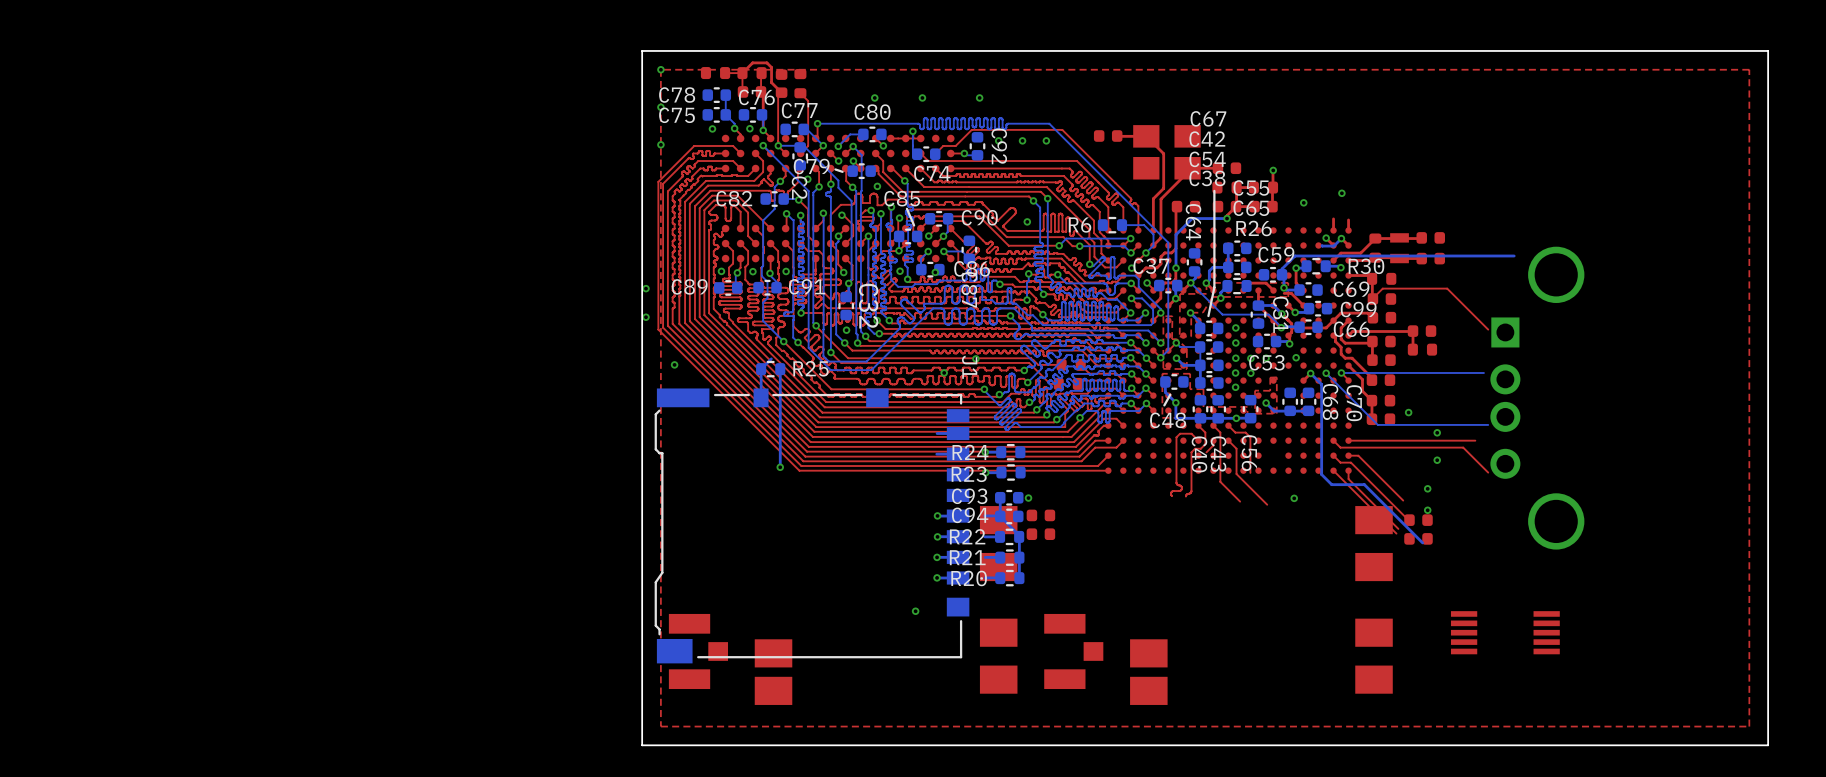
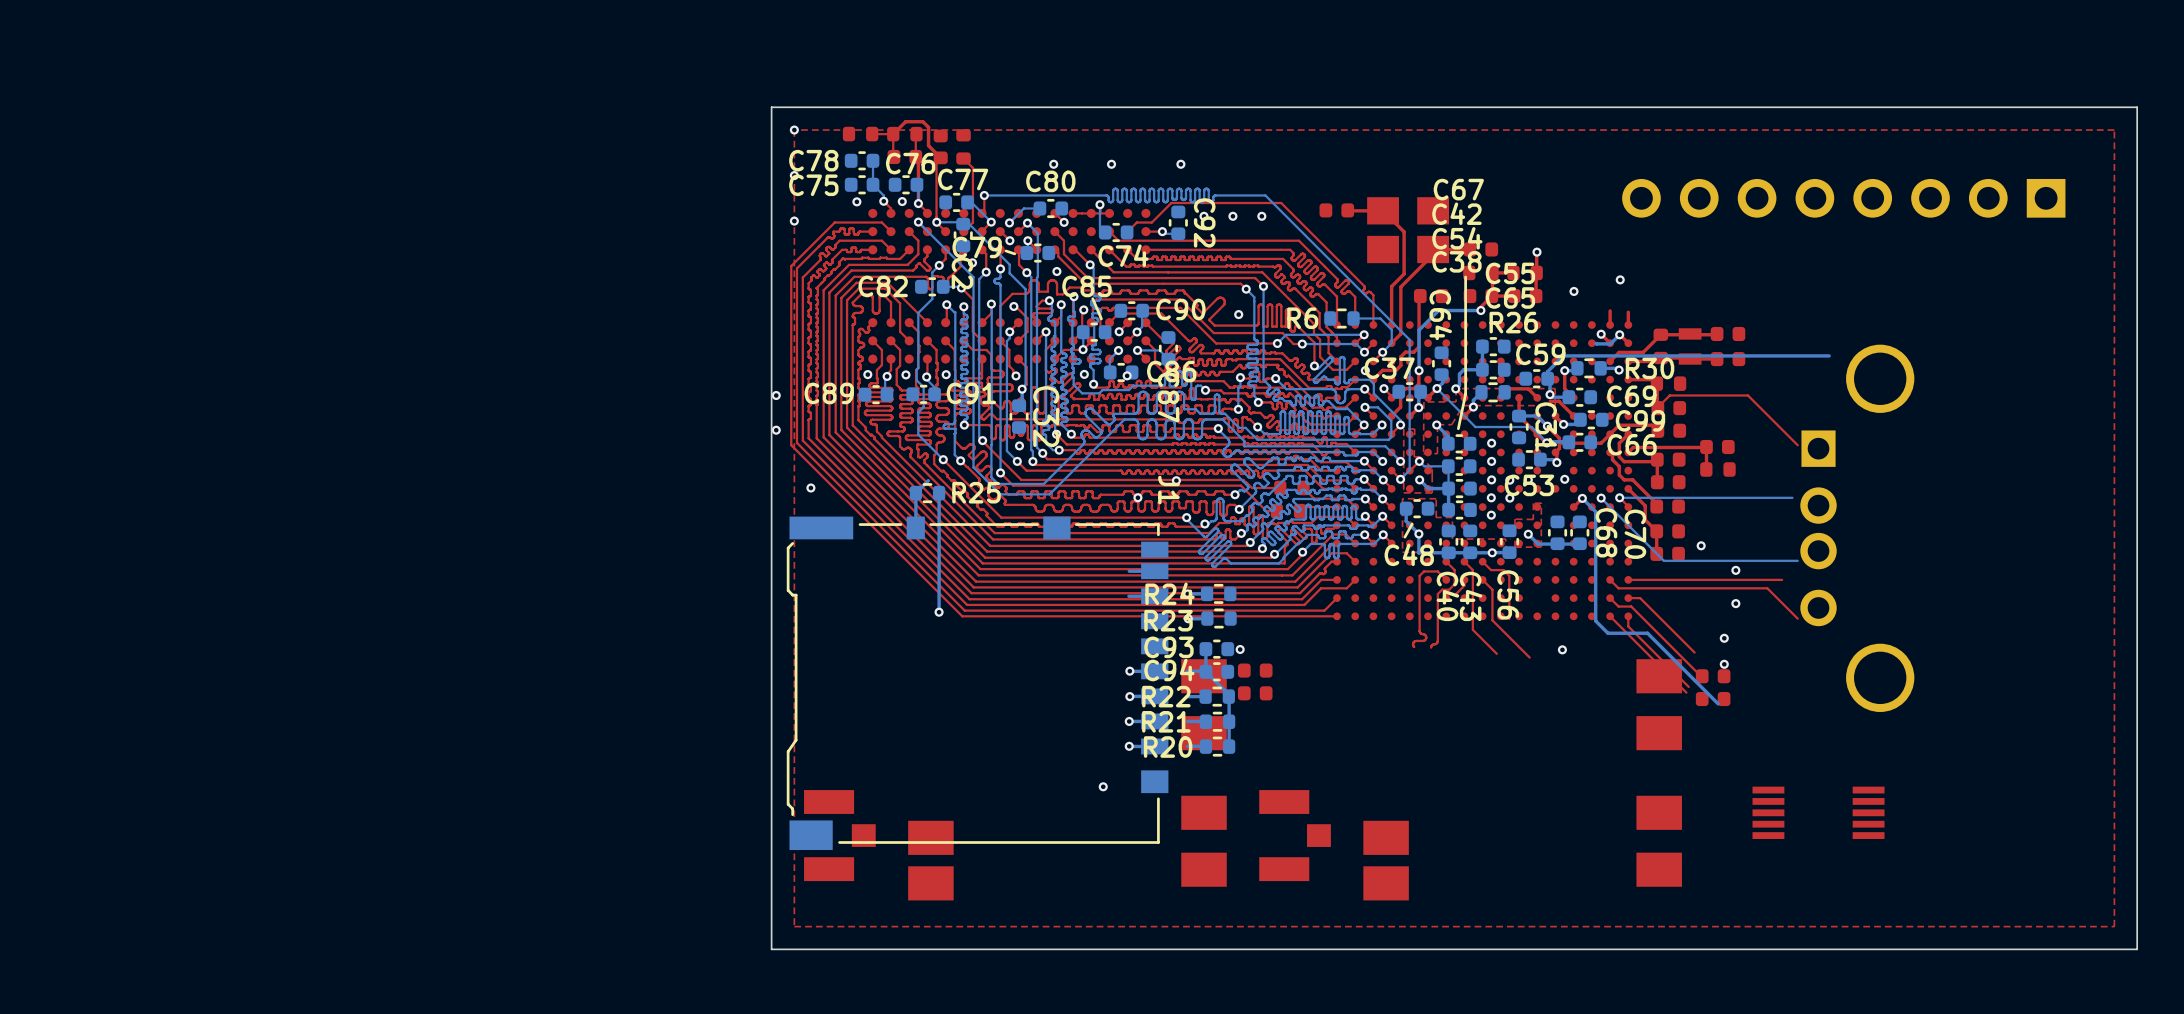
part: none -> (1843, 198)

